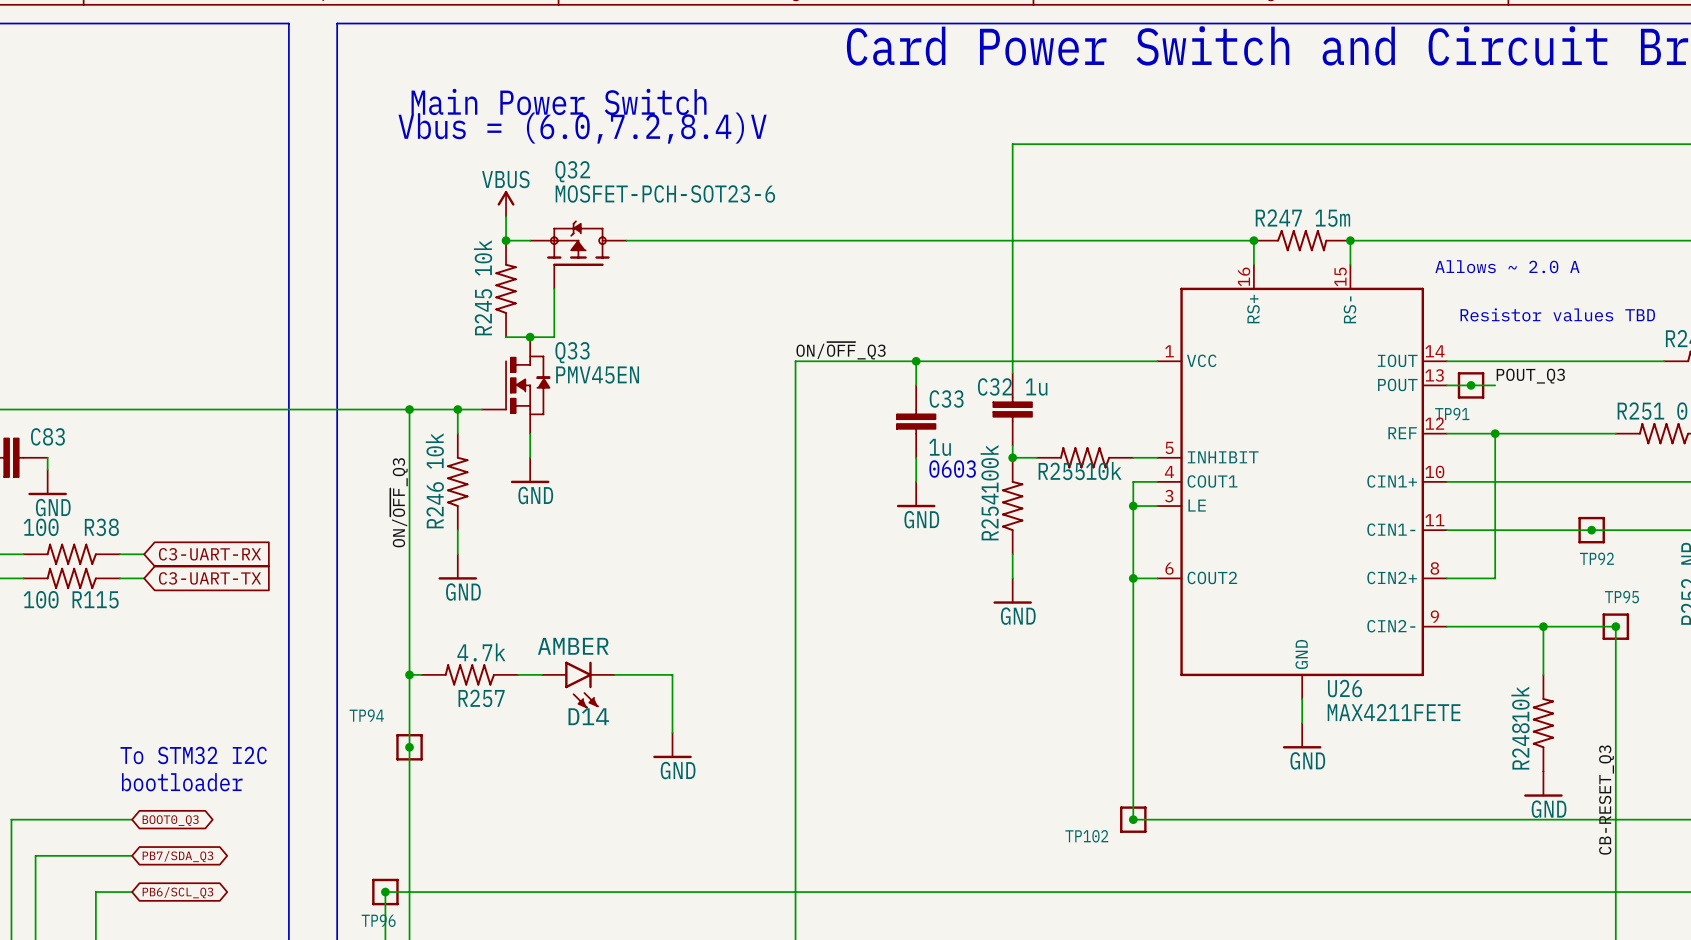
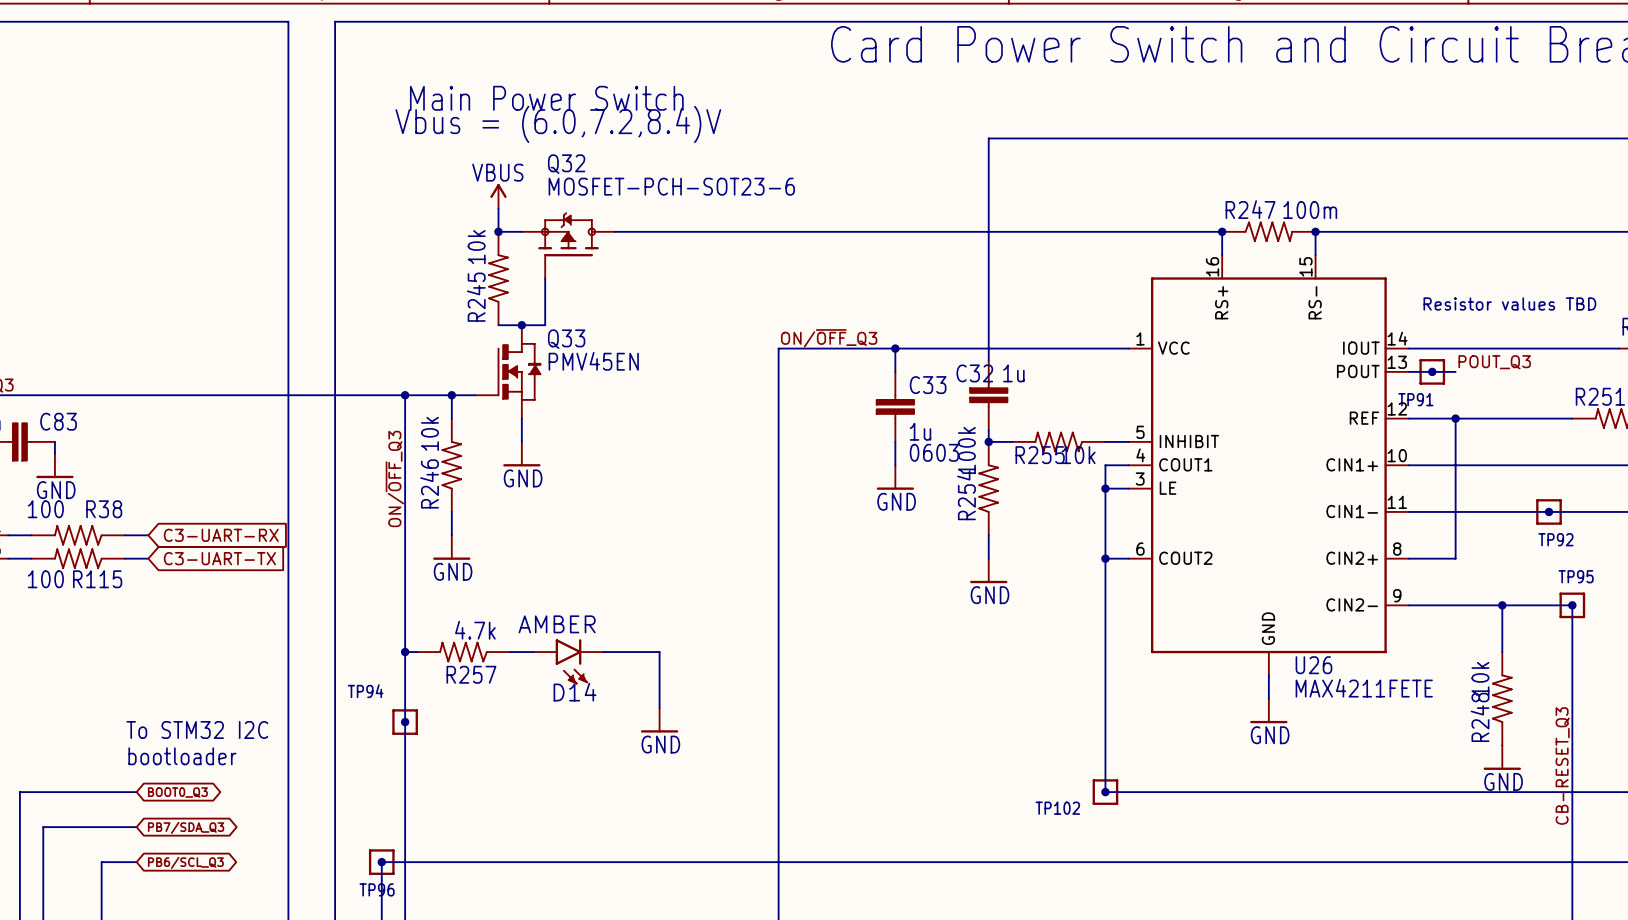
R247 value: 15m (1332, 218) -> 100m (1310, 210)
text: Allows ~ 2.0 A (1507, 266) -> none

